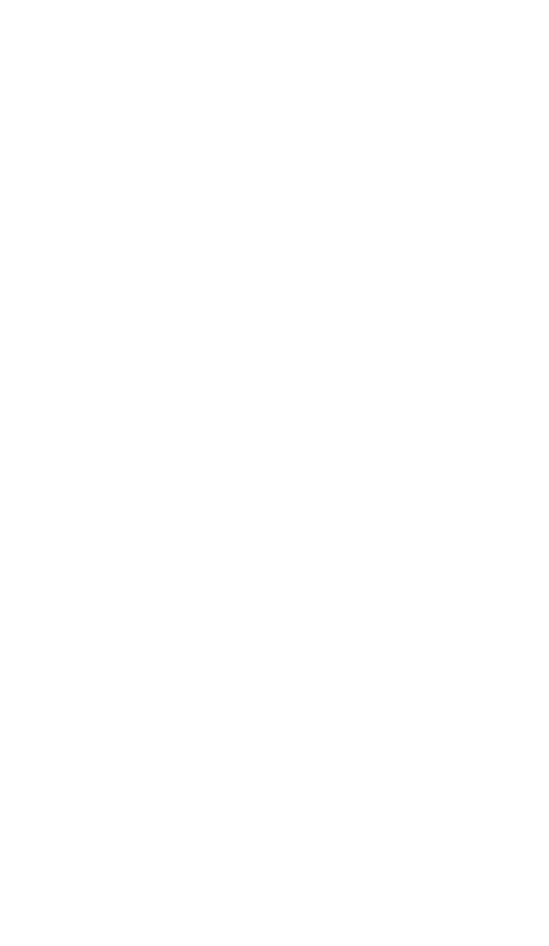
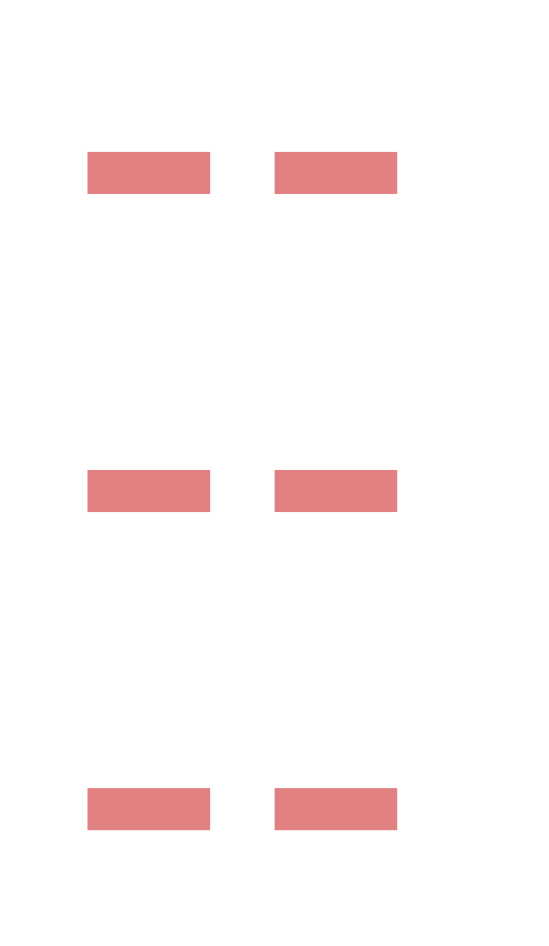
part: none -> (242, 172)
part: none -> (242, 491)
part: none -> (242, 809)

